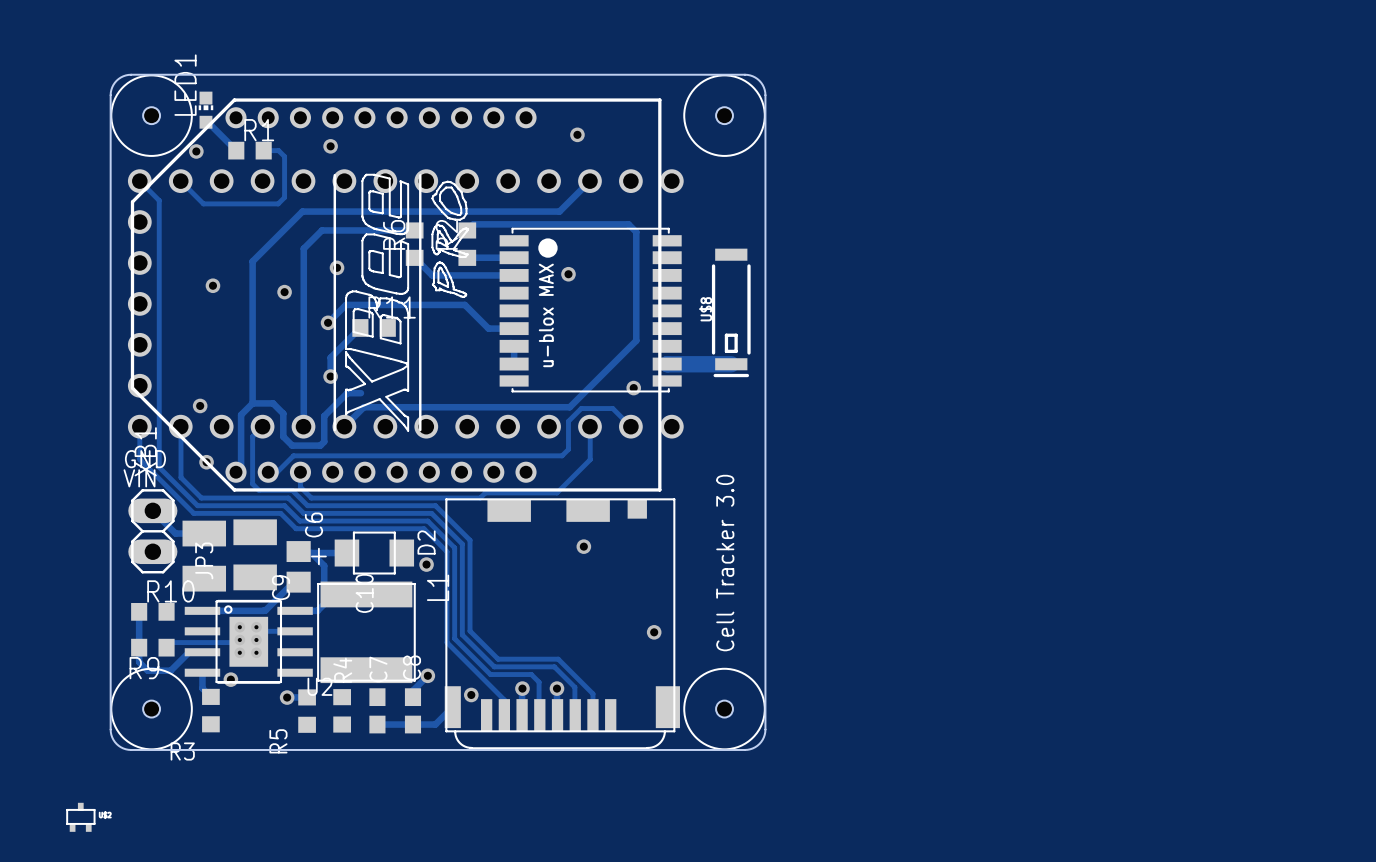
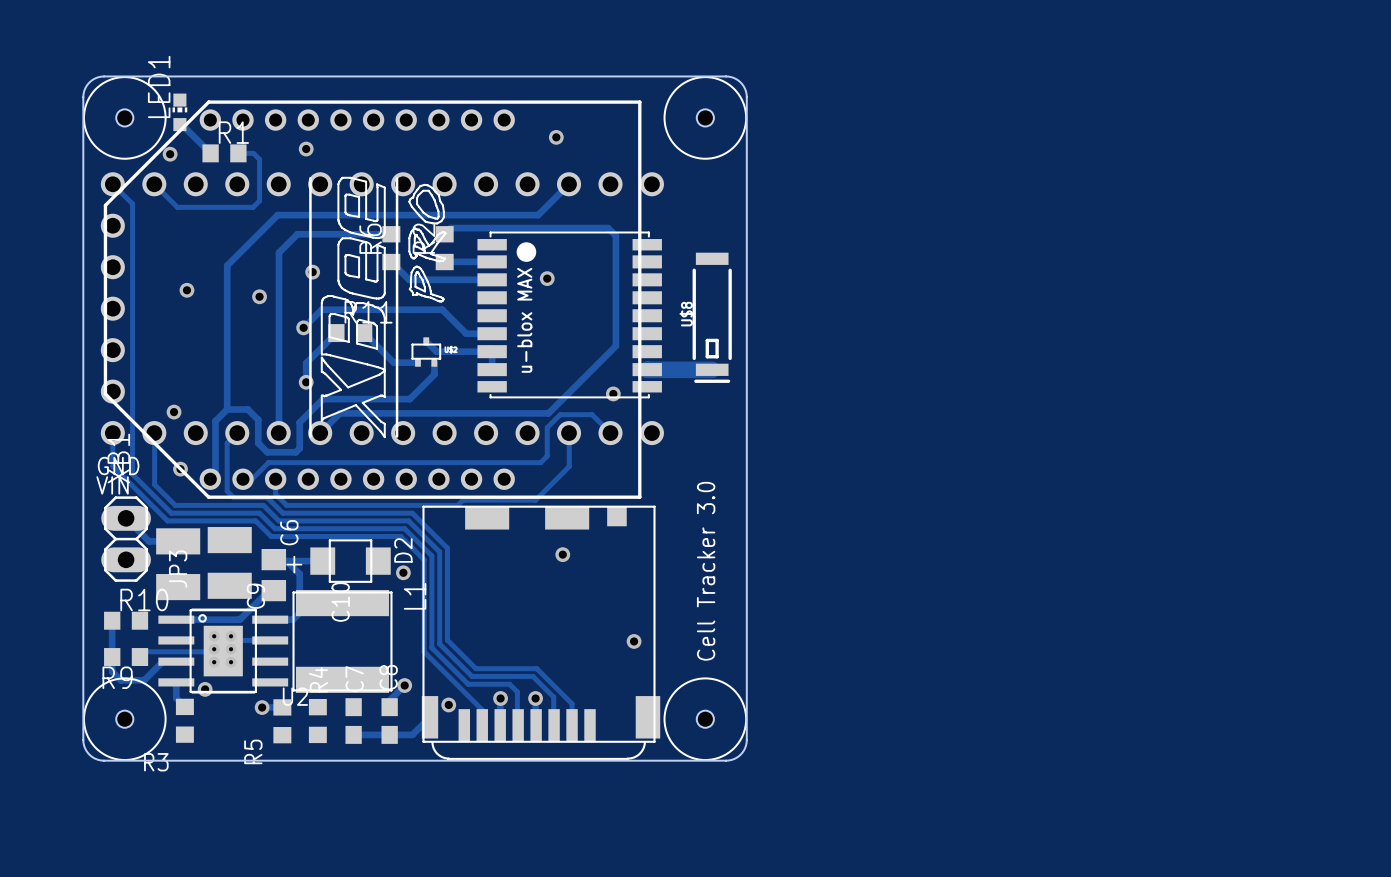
track: none -> (364, 333) (393, 362) (417, 362)
track: none -> (426, 341) (436, 351) (492, 351)
track: none -> (434, 362) (434, 374) (409, 399) (336, 399)
part position: (80, 817) -> (426, 352)

